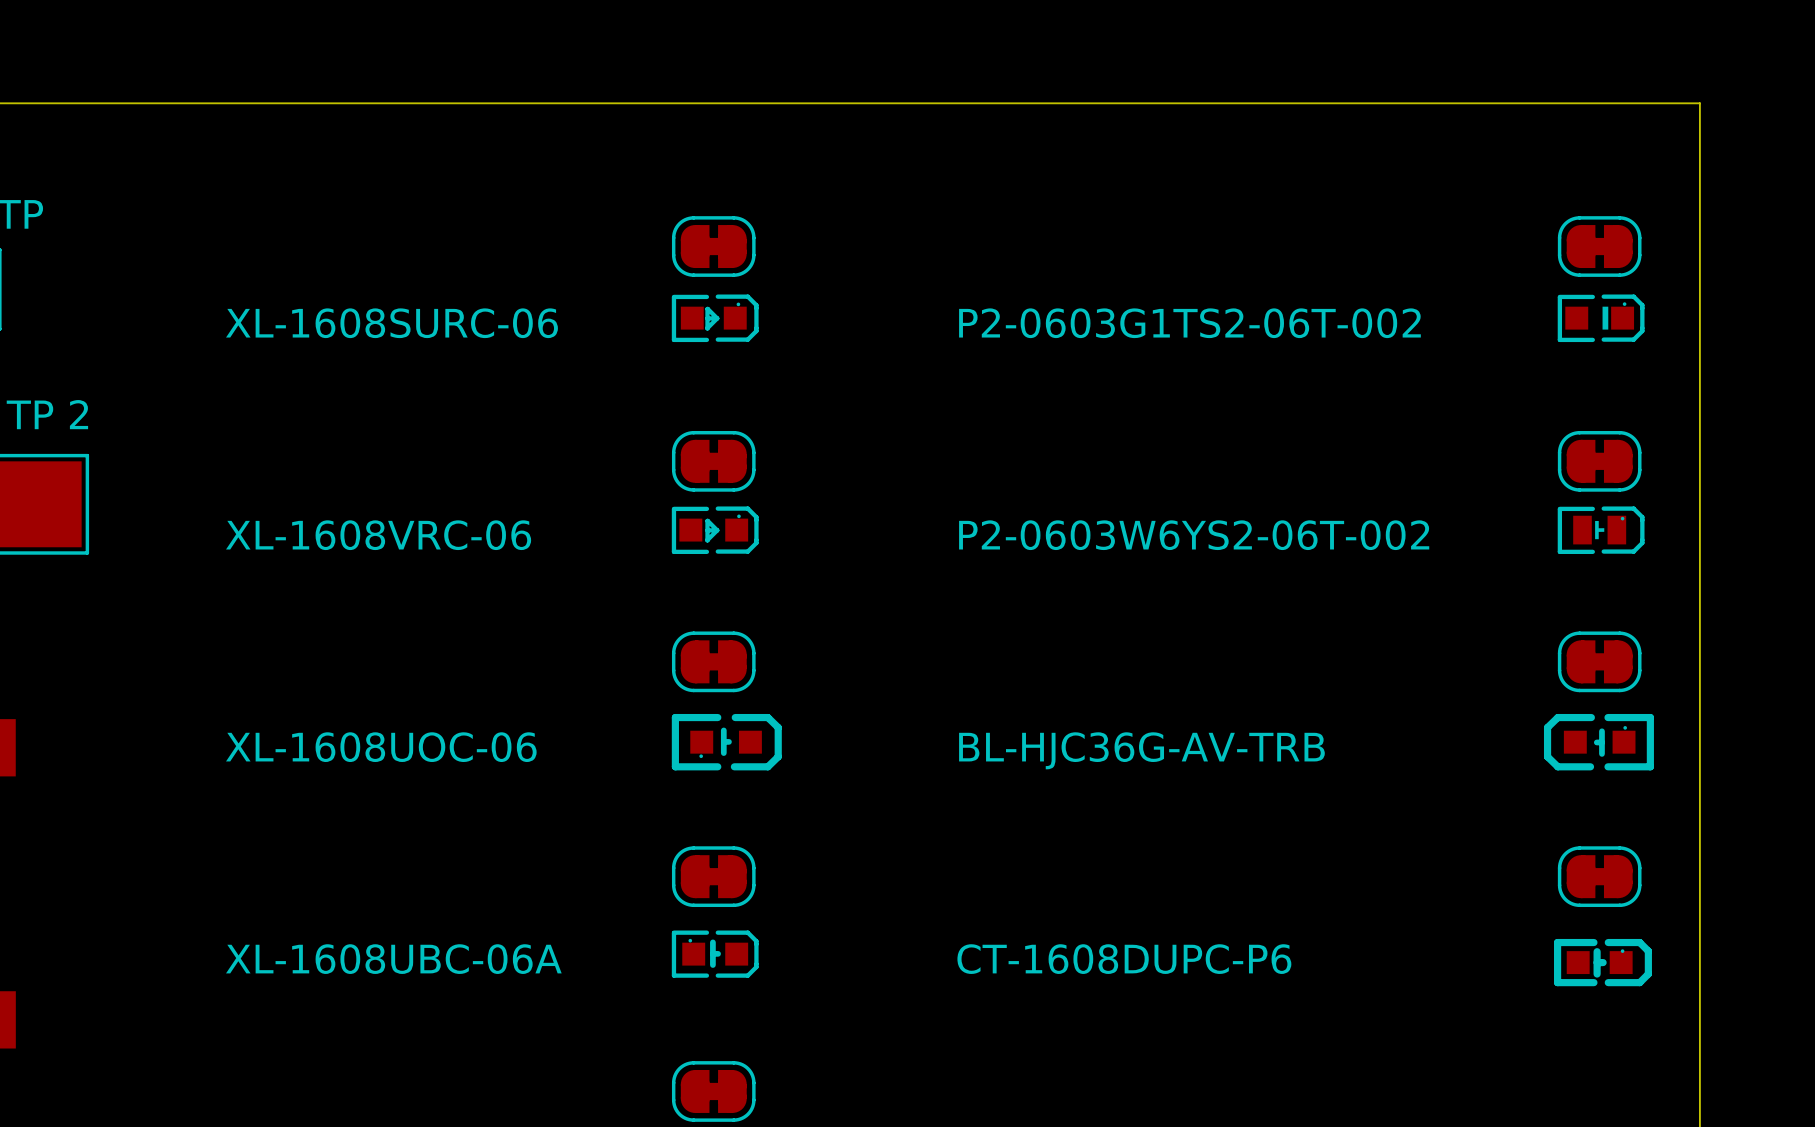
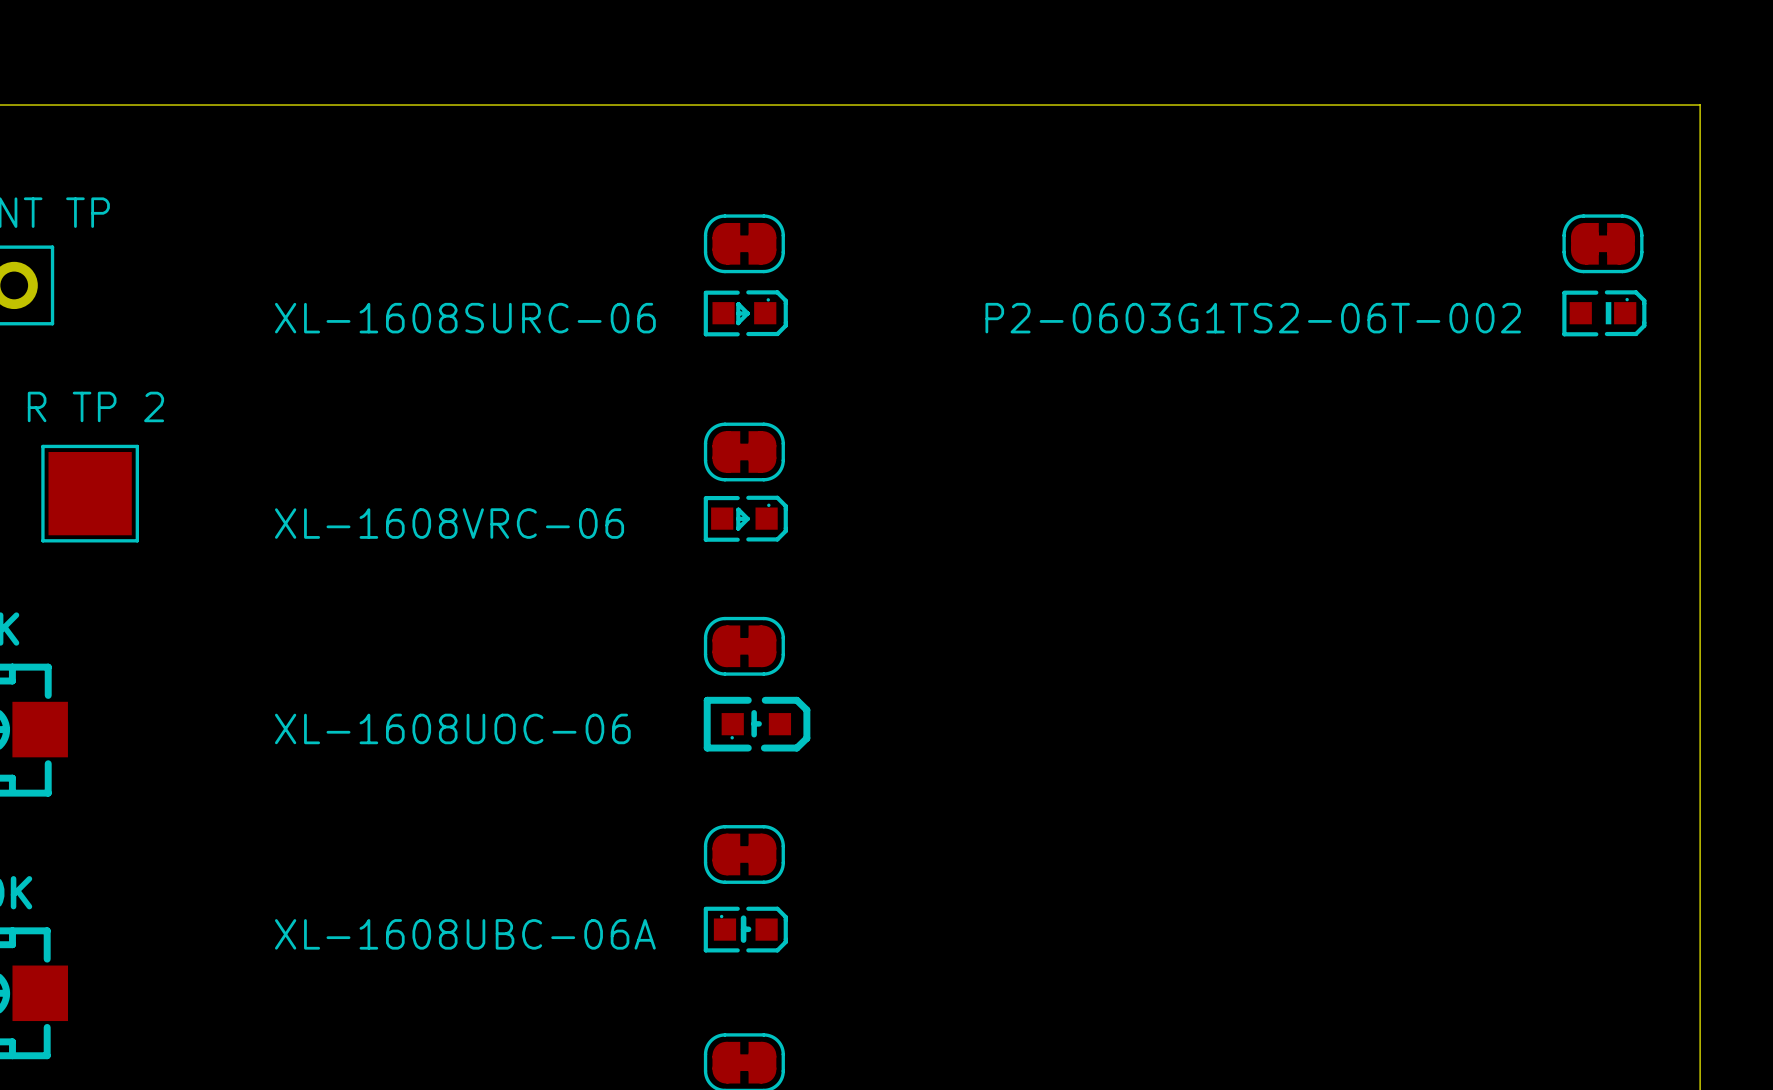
part: (1599, 461) -> none
part: (1601, 530) -> none
text: P2-0603W6YS2-06T-002 (1194, 535) -> none
part: (1599, 661) -> none
part: (1598, 742) -> none
text: BL-HJC36G-AV-TRB (1141, 750) -> none
part: (1599, 876) -> none
text: CT-1608DUPC-P6 (1124, 959) -> none
part: (1602, 962) -> none

